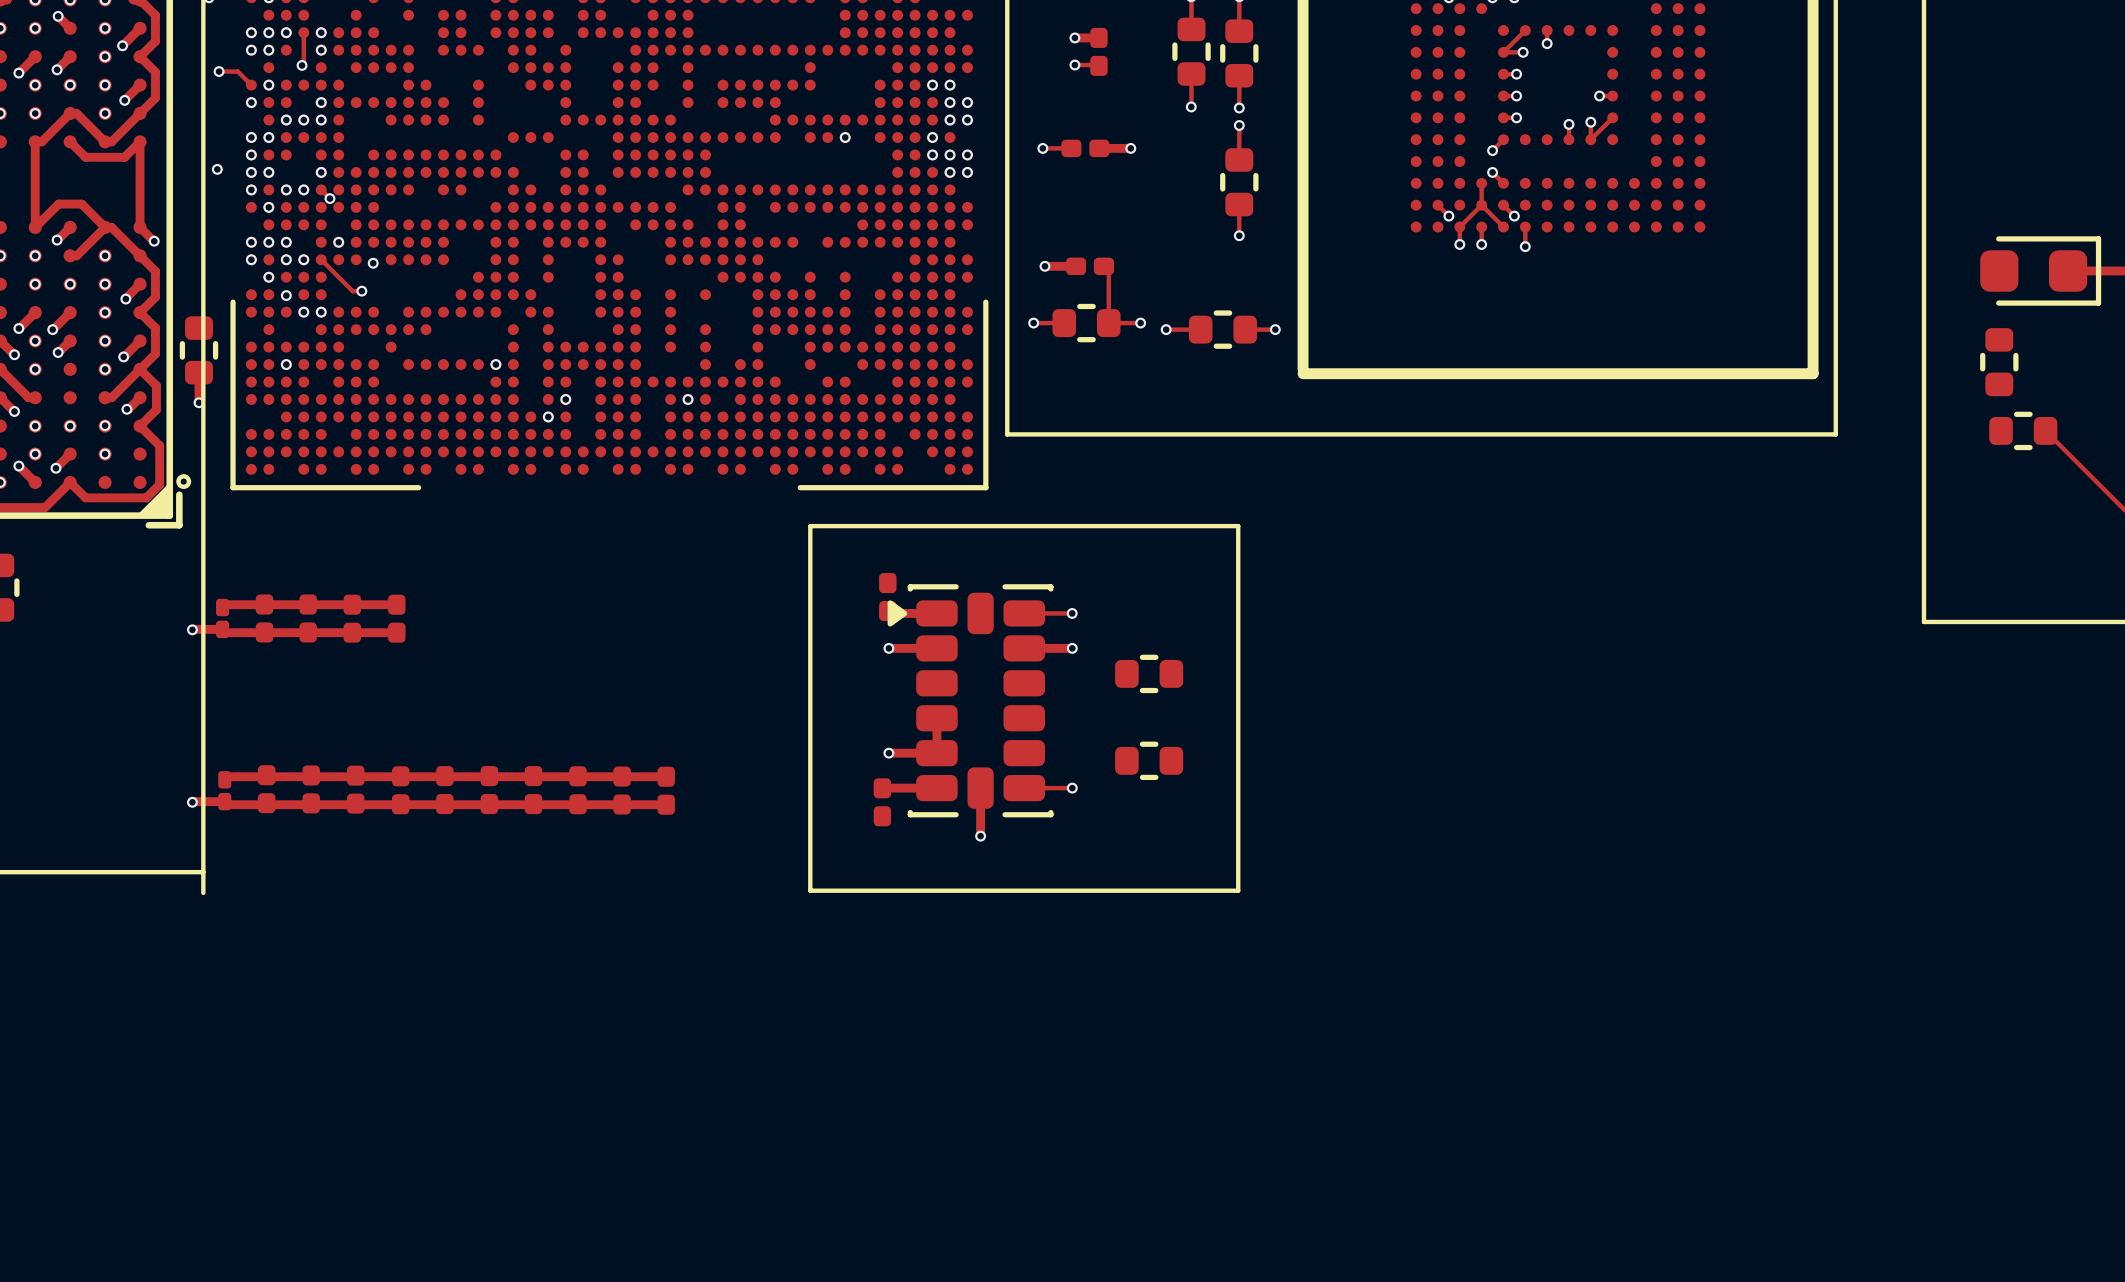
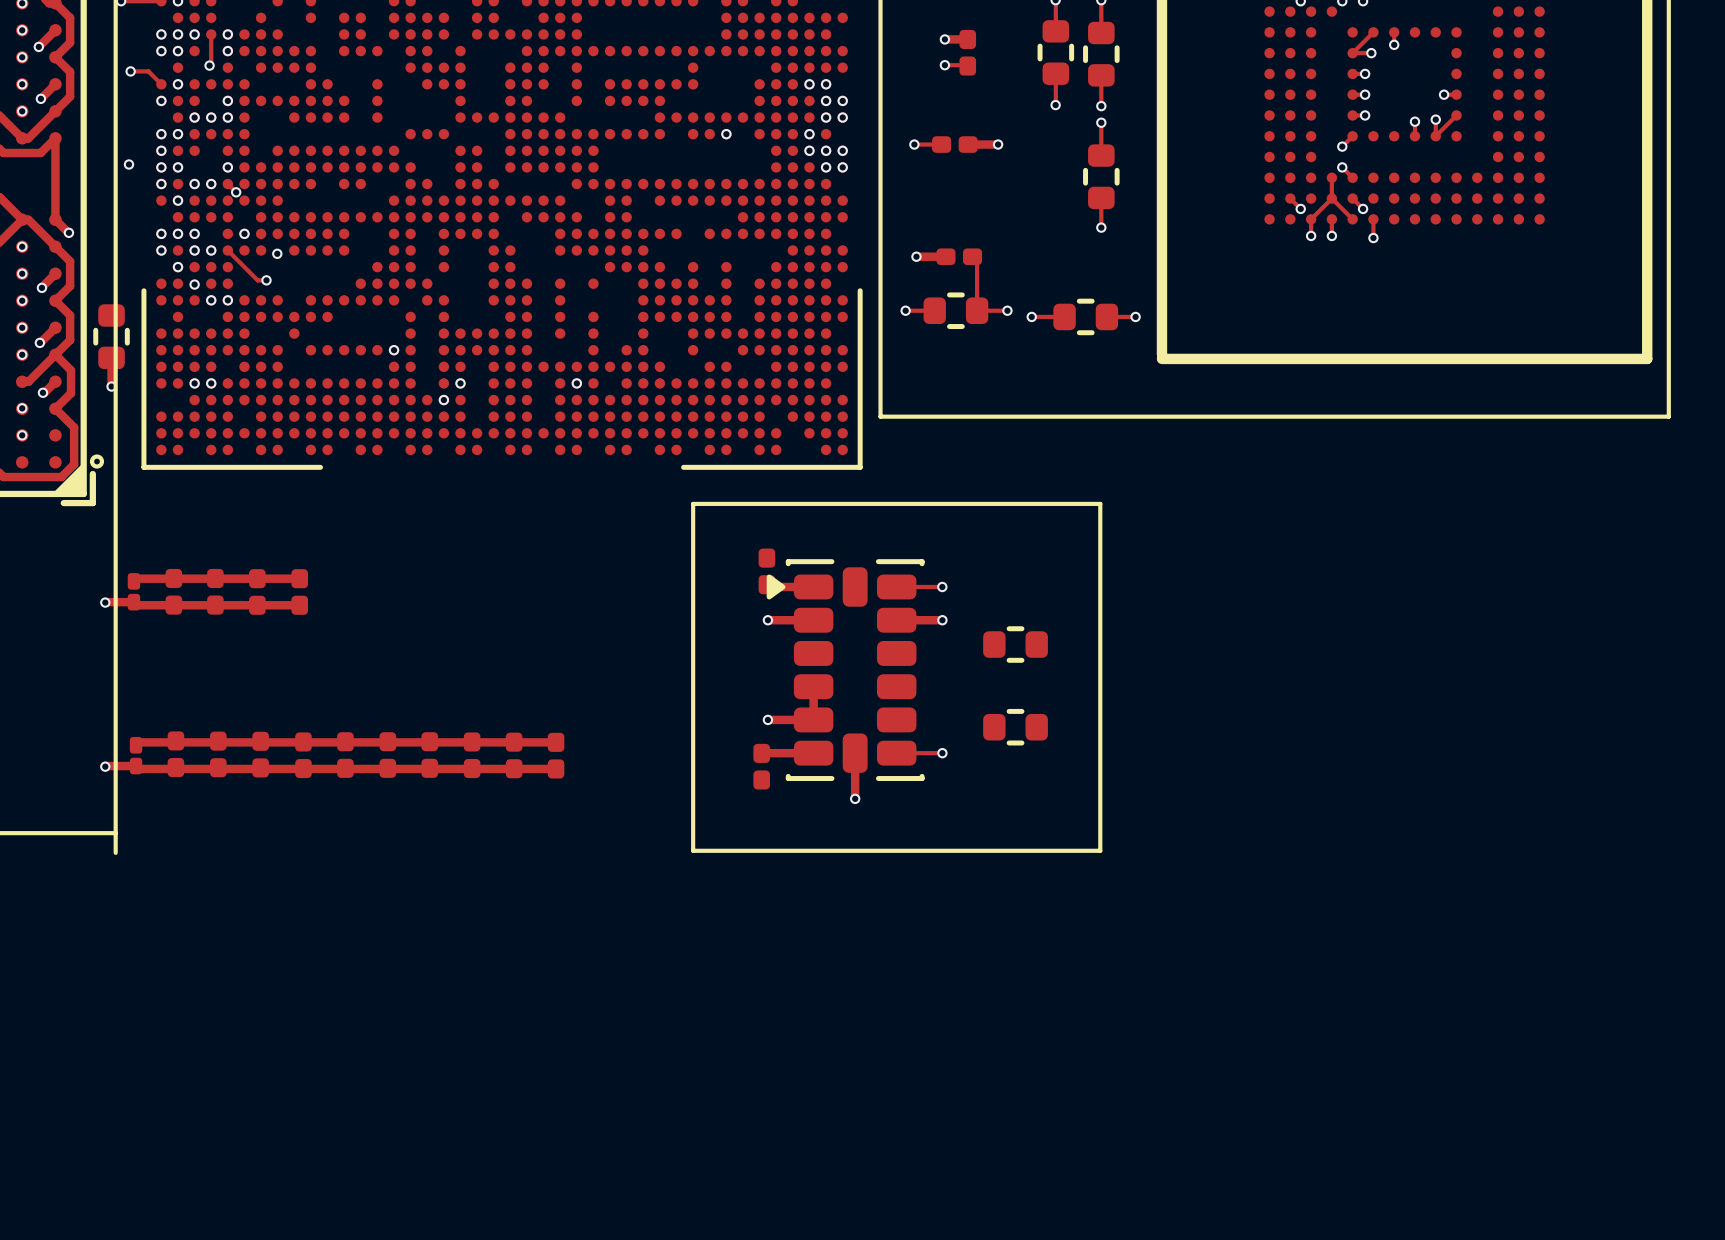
via: (286, 364) -> none
via: none -> (194, 383)
via: none -> (211, 383)

